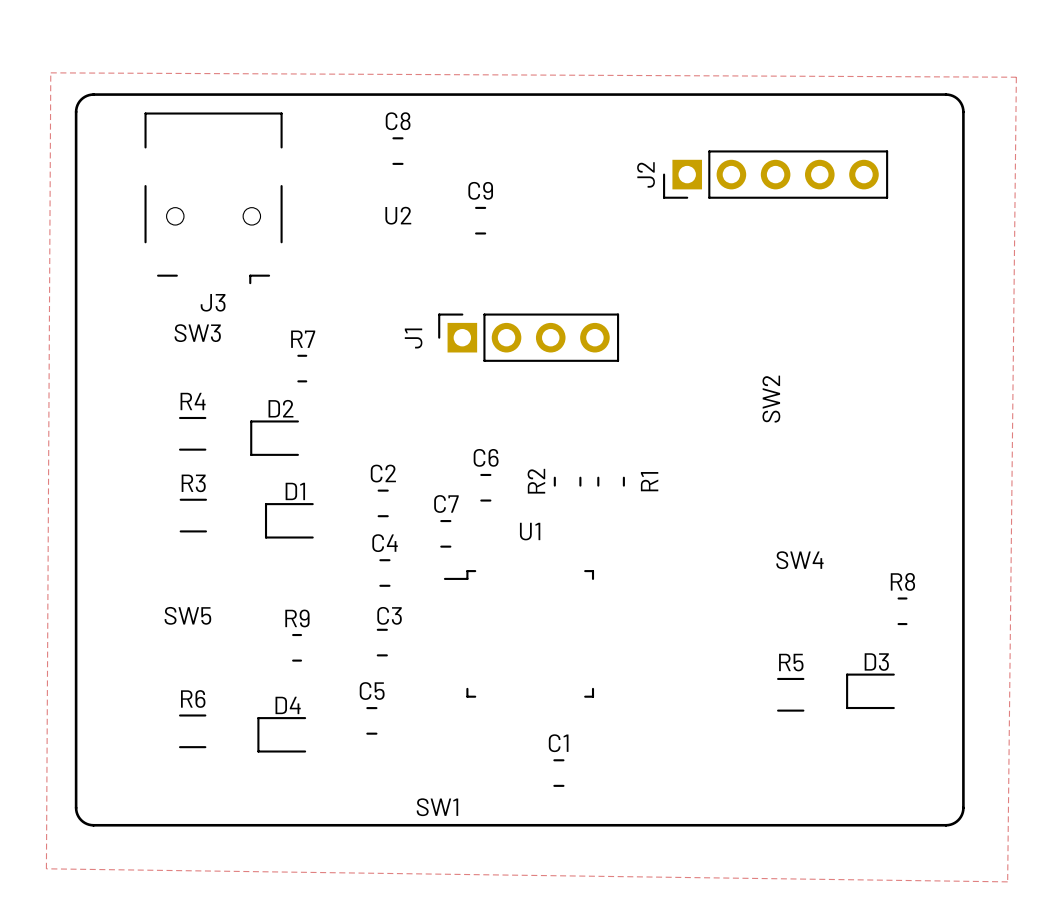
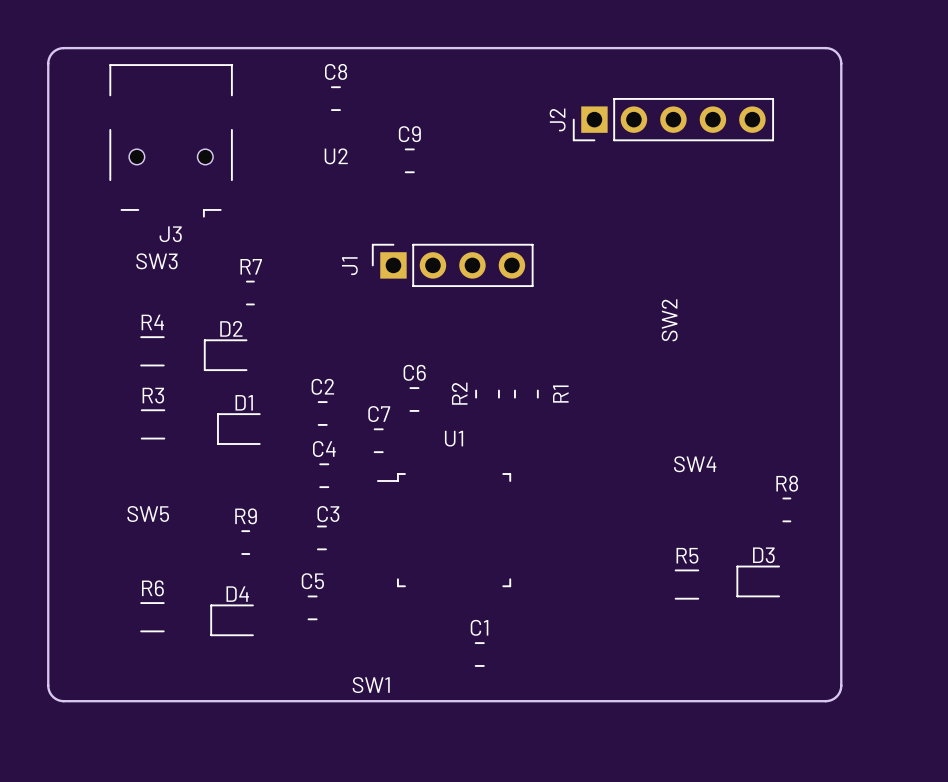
zone outline: (50, 72) (46, 868) (1007, 881) (1016, 77) (50, 72) -> none

